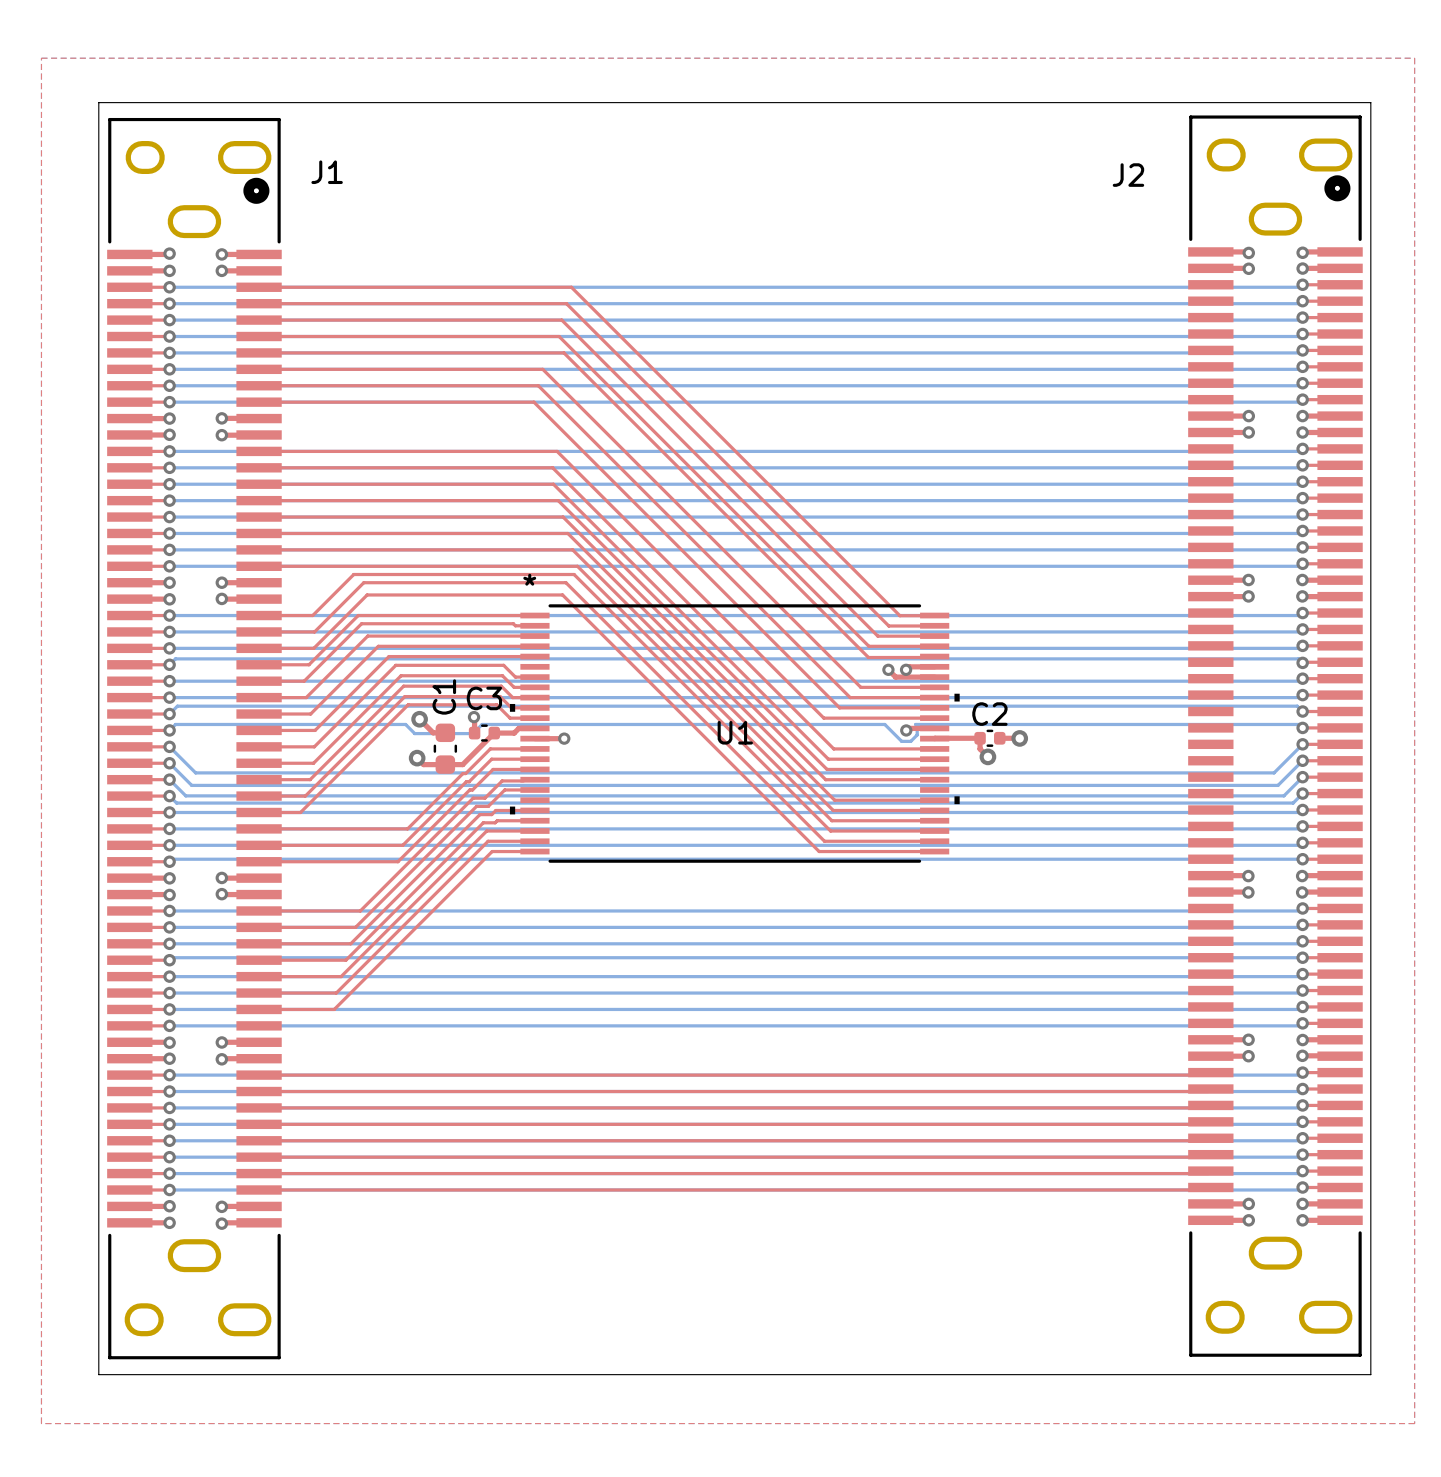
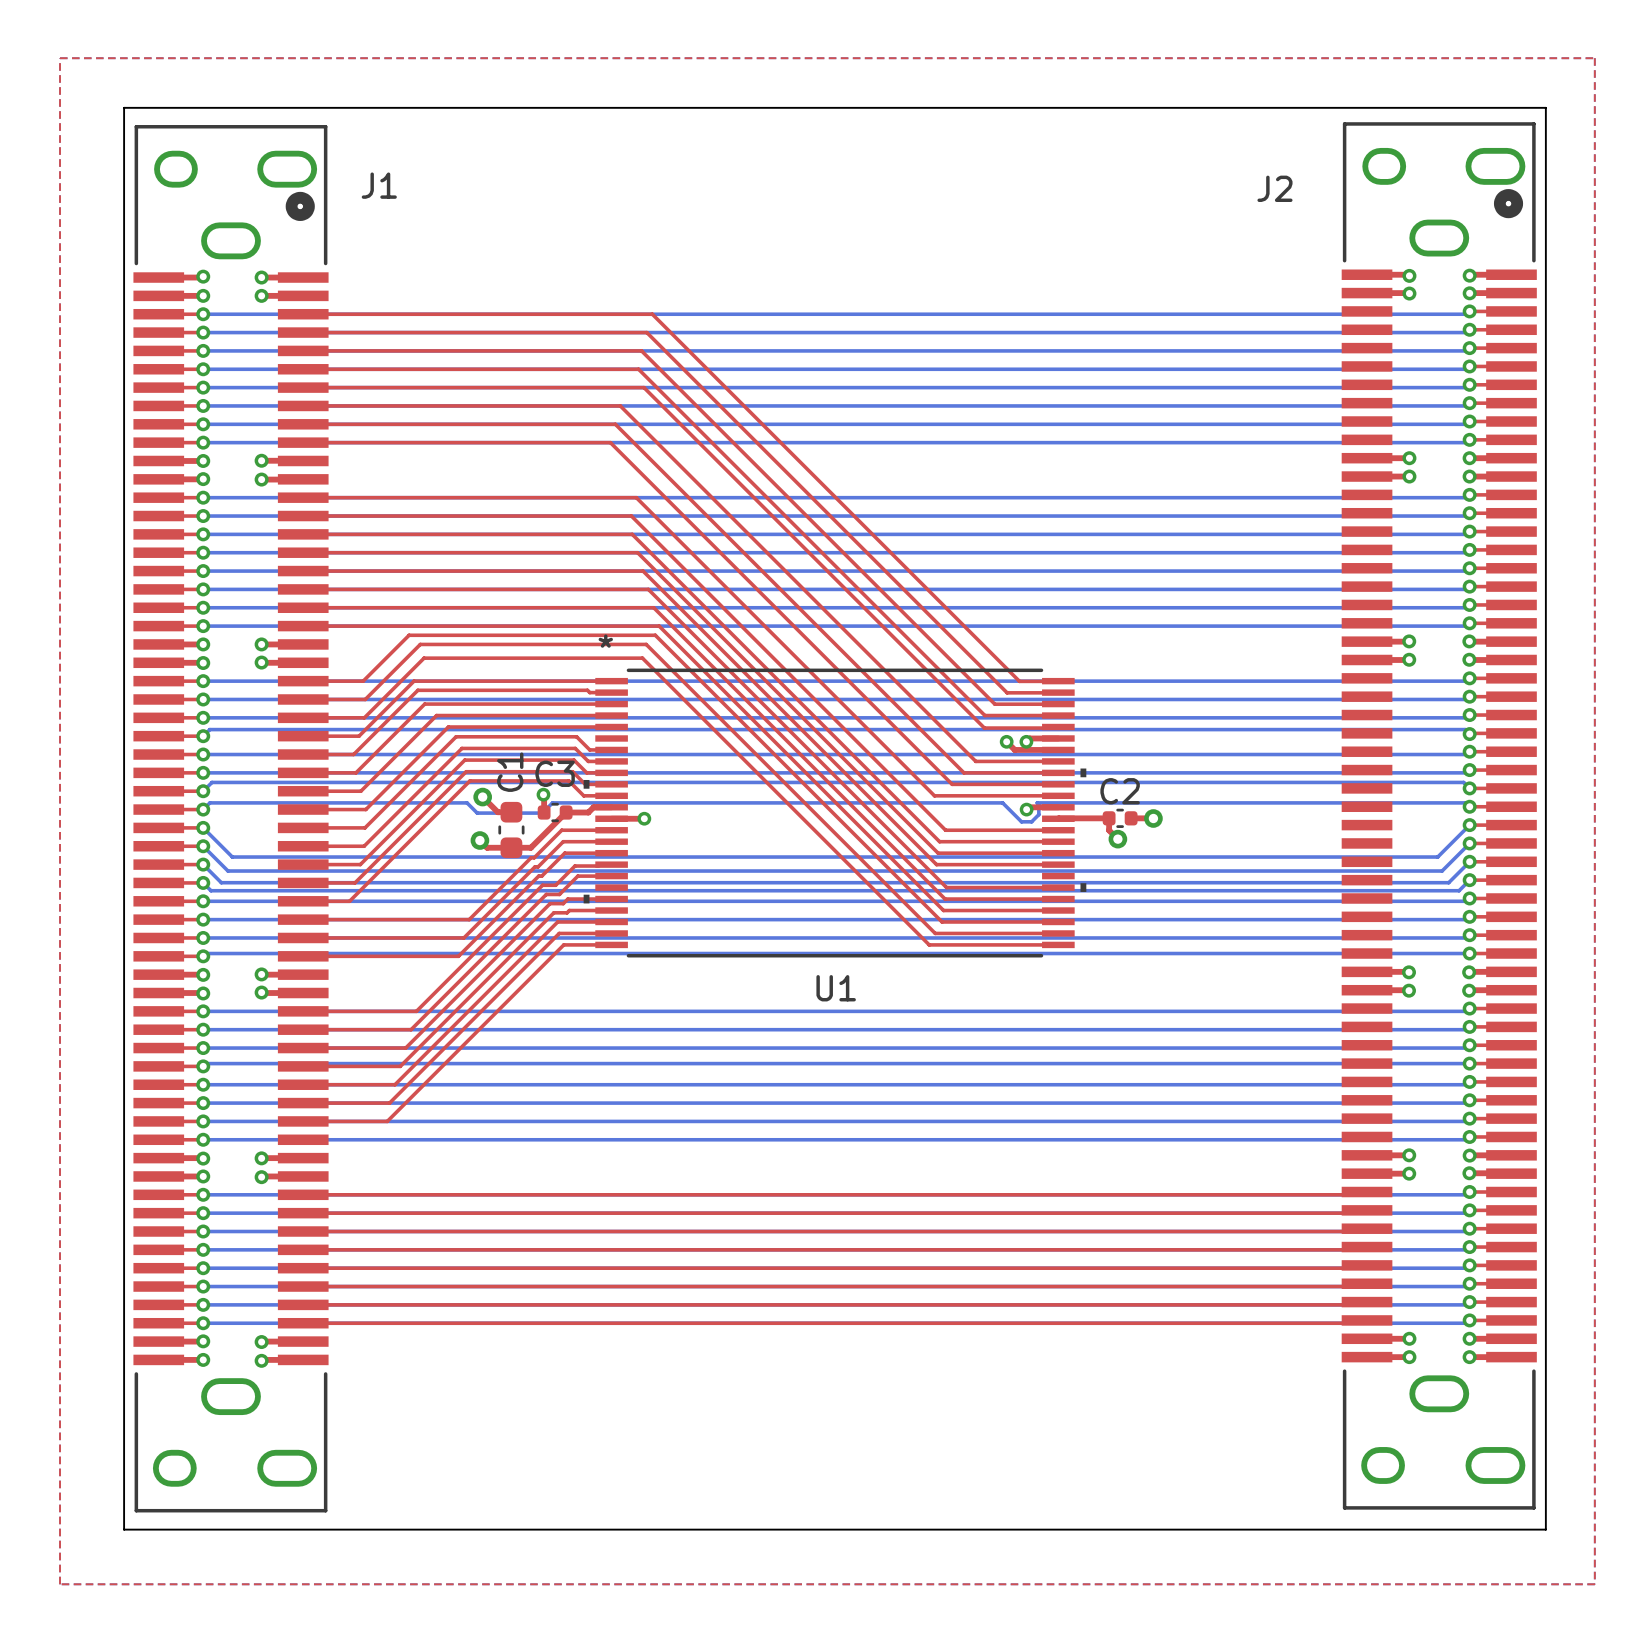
U1 name position: U1 (735, 732) -> U1 (836, 988)

